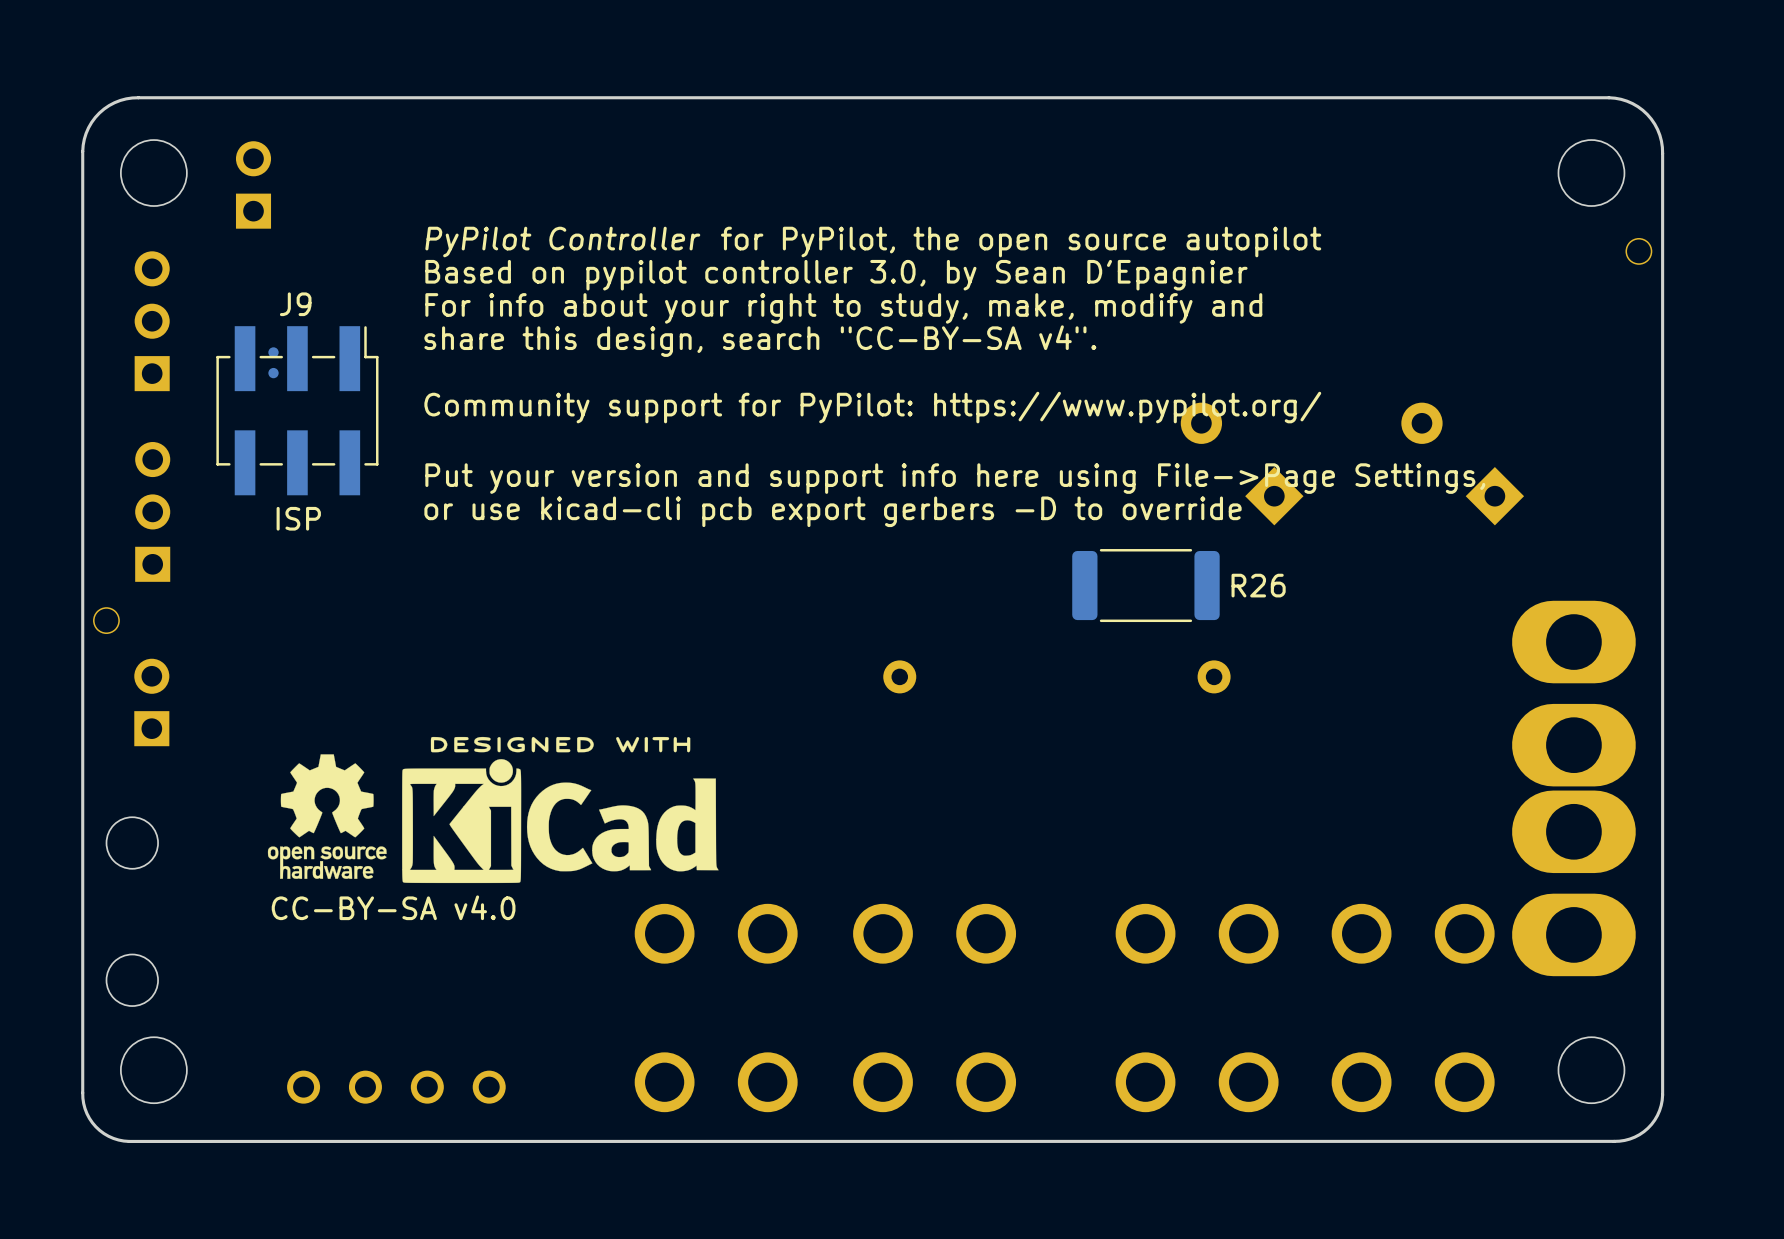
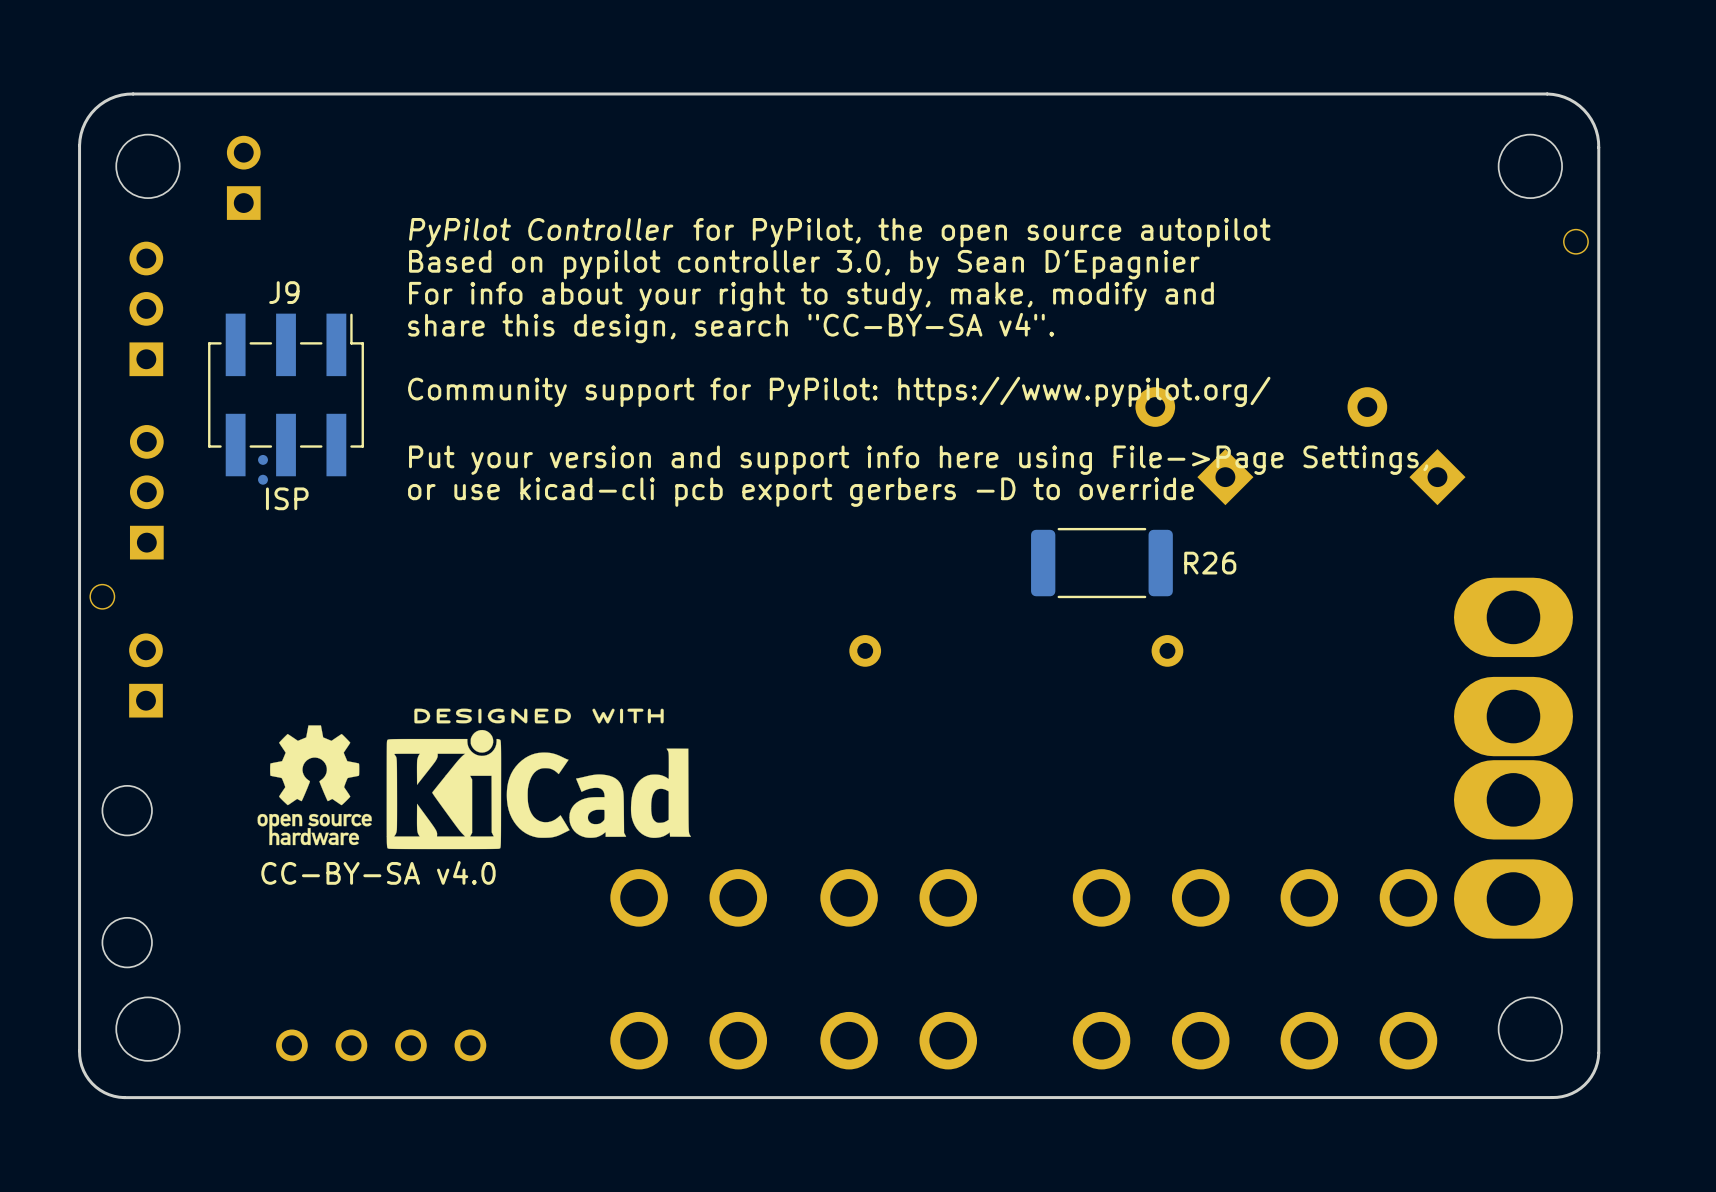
part position: (273, 362) -> (263, 469)

